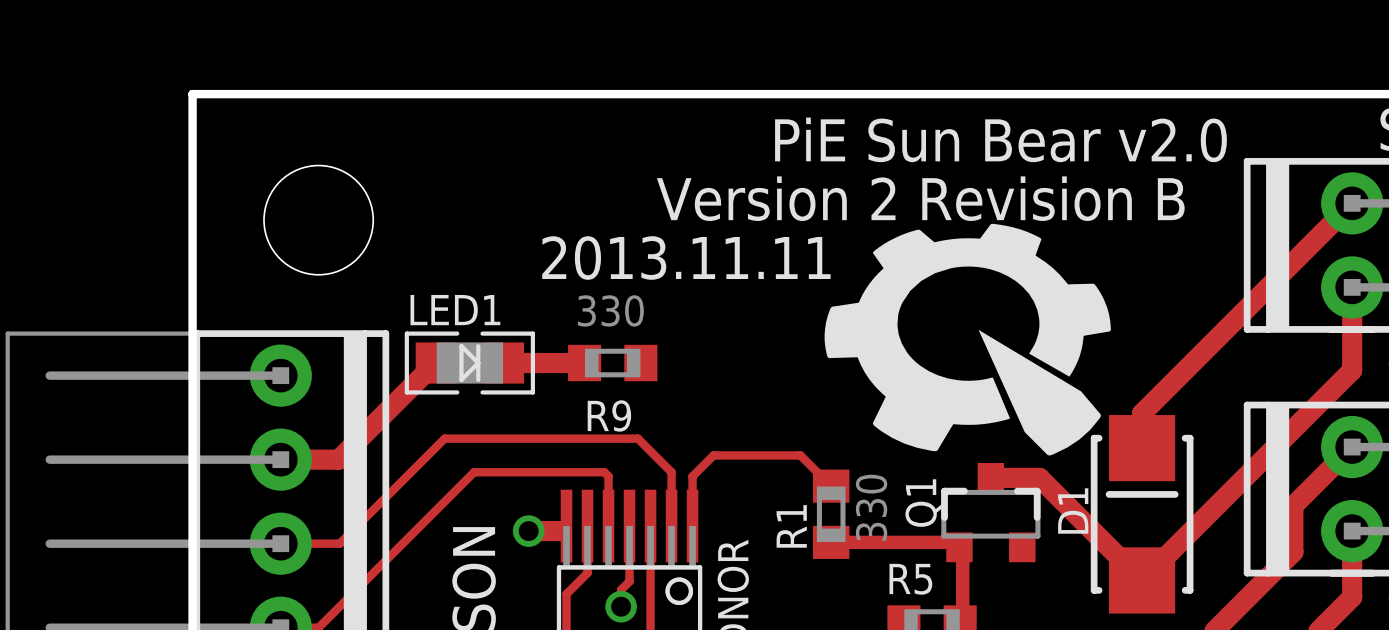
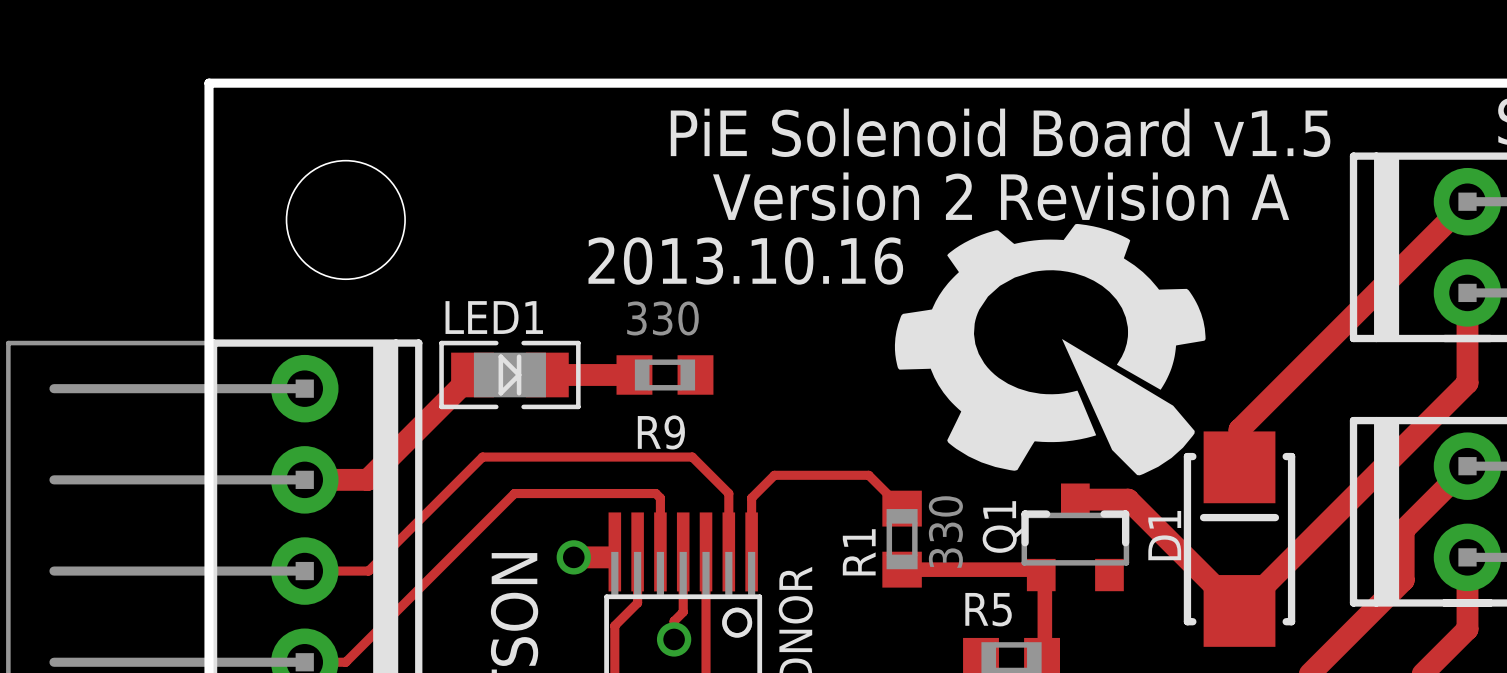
text: PiE Sun Bear v2.0 (1000, 139) -> PiE Solenoid Board v1.5 (1000, 132)
text: Version 2 Revision B (920, 198) -> Version 2 Revision A (1001, 196)
text: 2013.11.11 (686, 258) -> 2013.10.16 (745, 261)

